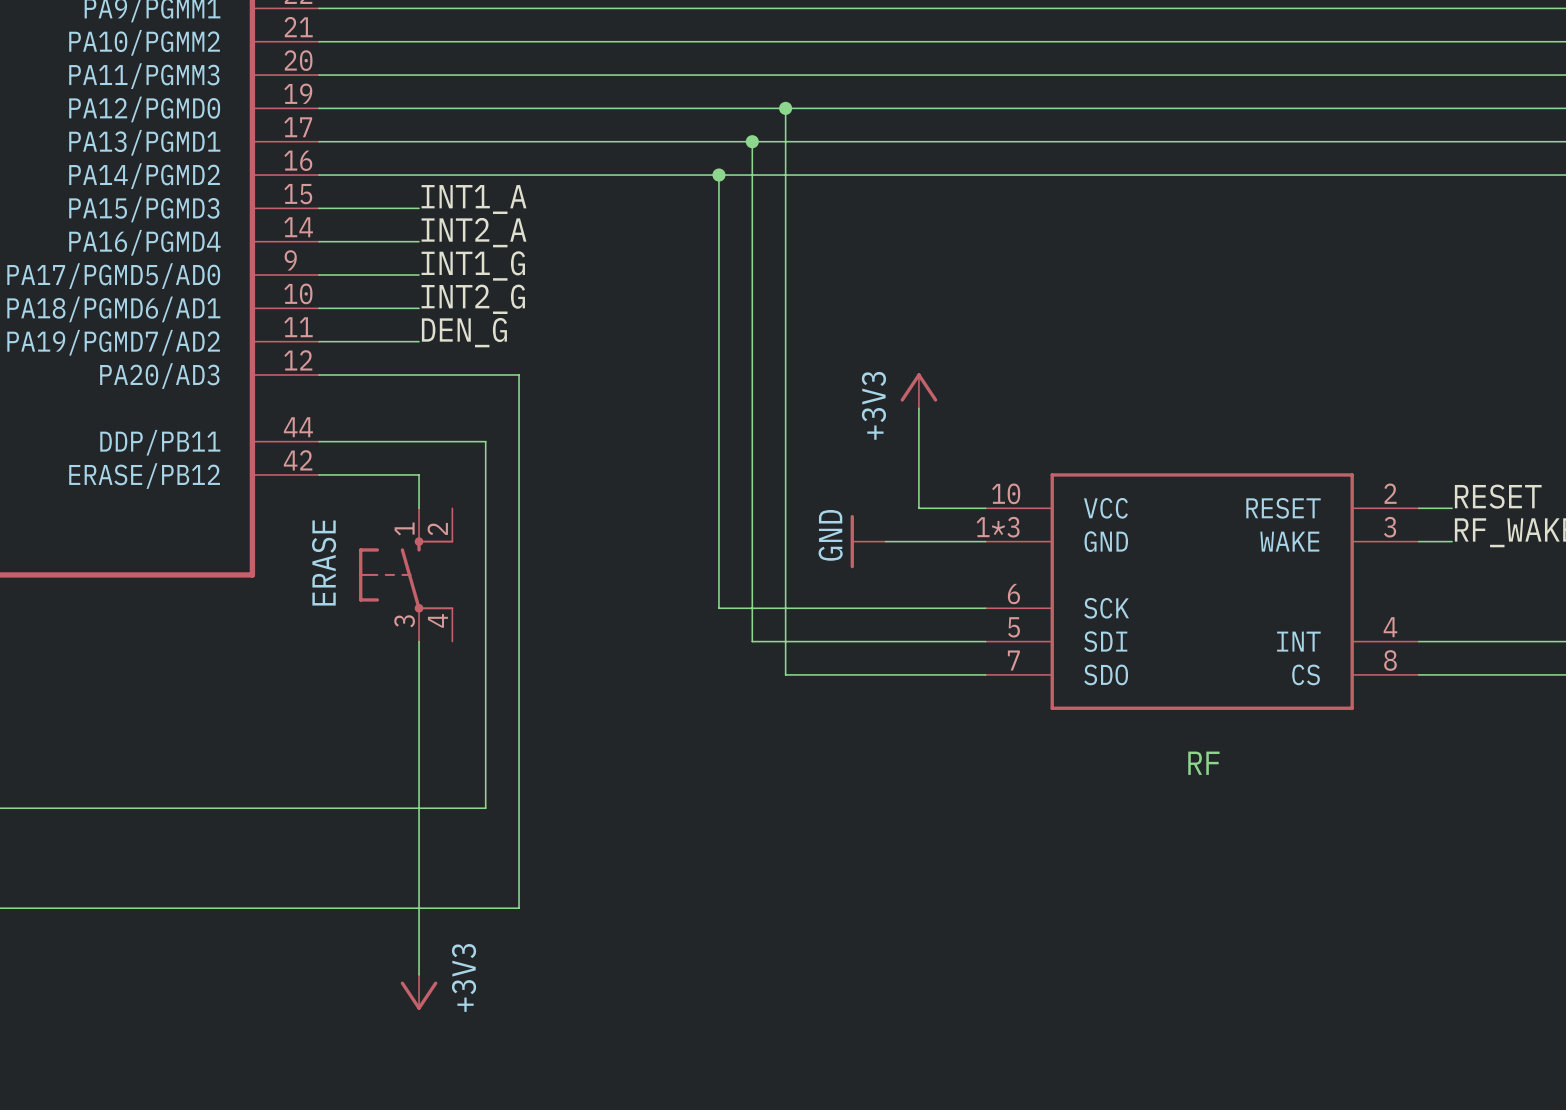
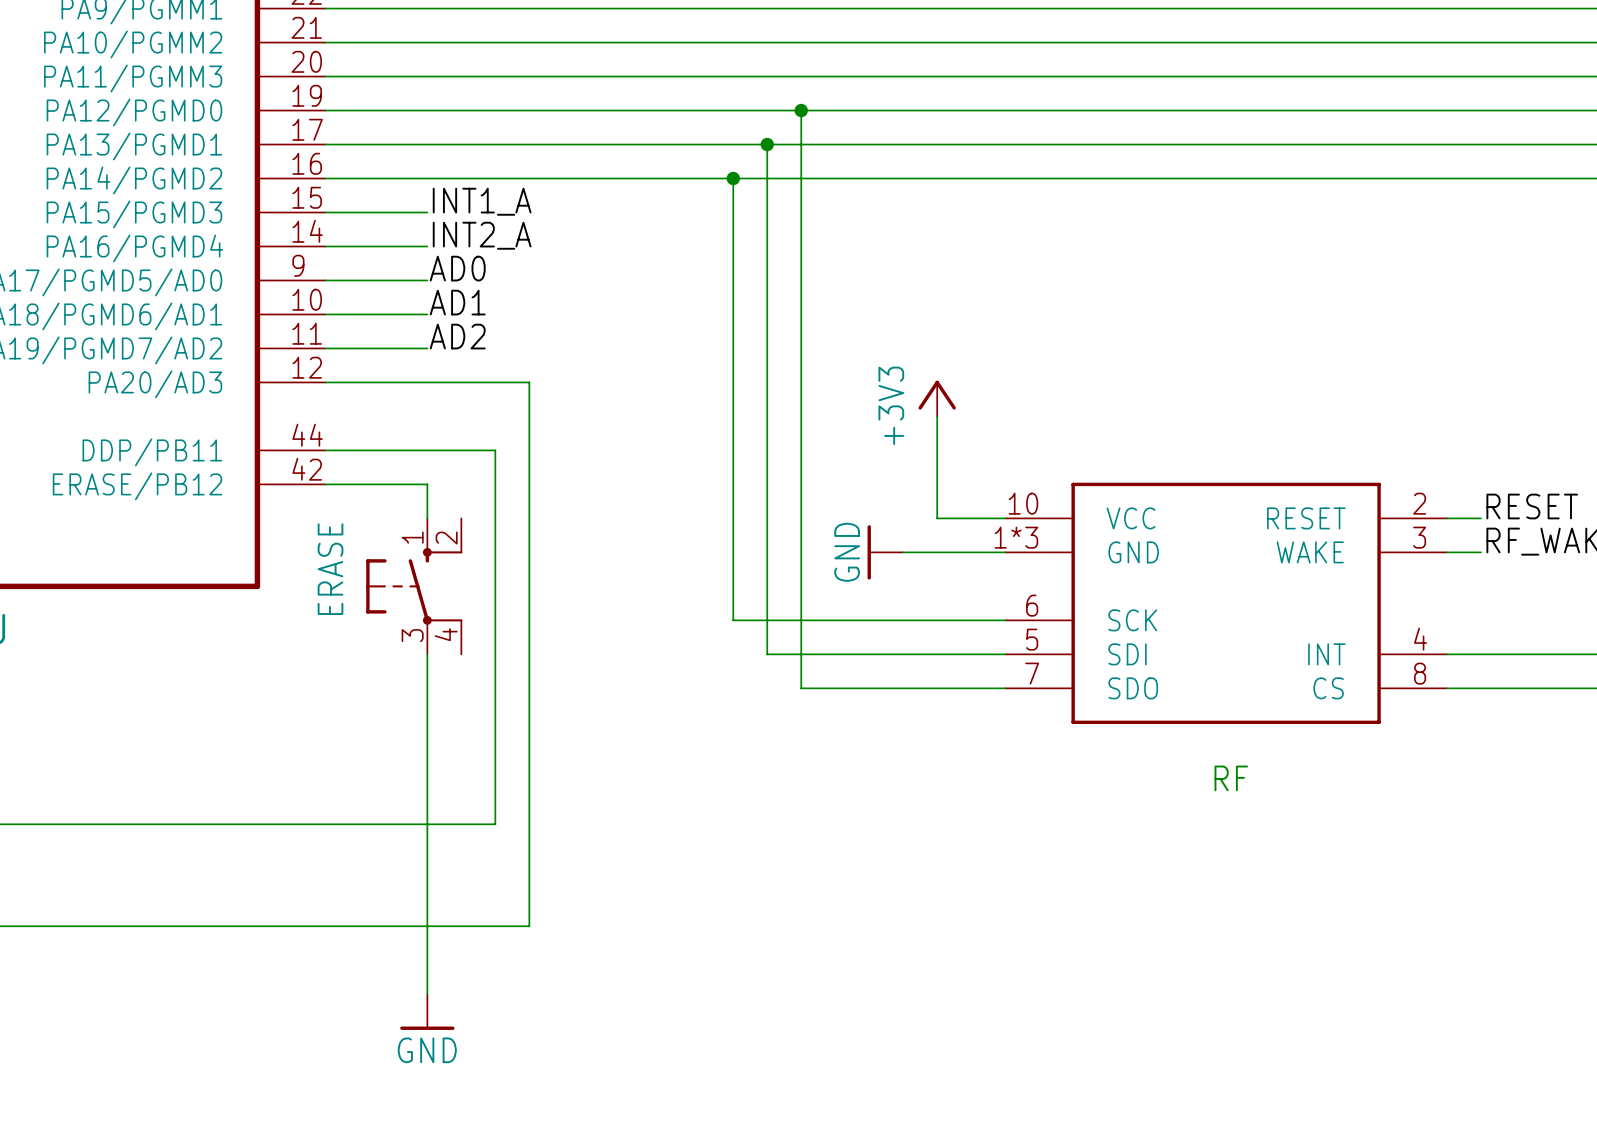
label: INT1_G (473, 265) -> AD0 (457, 268)
label: INT2_G (473, 299) -> AD1 (457, 302)
label: DEN_G (464, 332) -> AD2 (457, 336)
power symbol: +3V3 (419, 992) -> GND (427, 1012)

